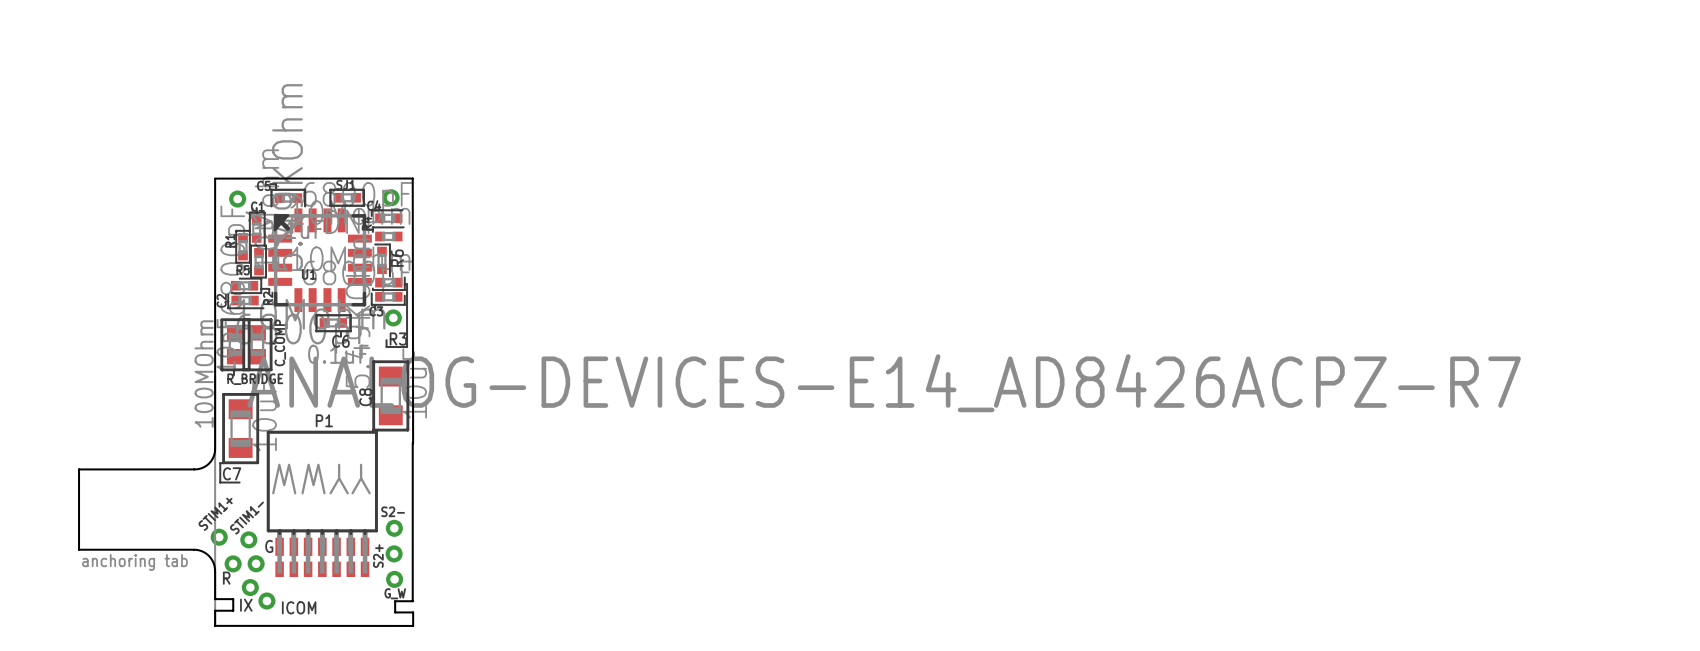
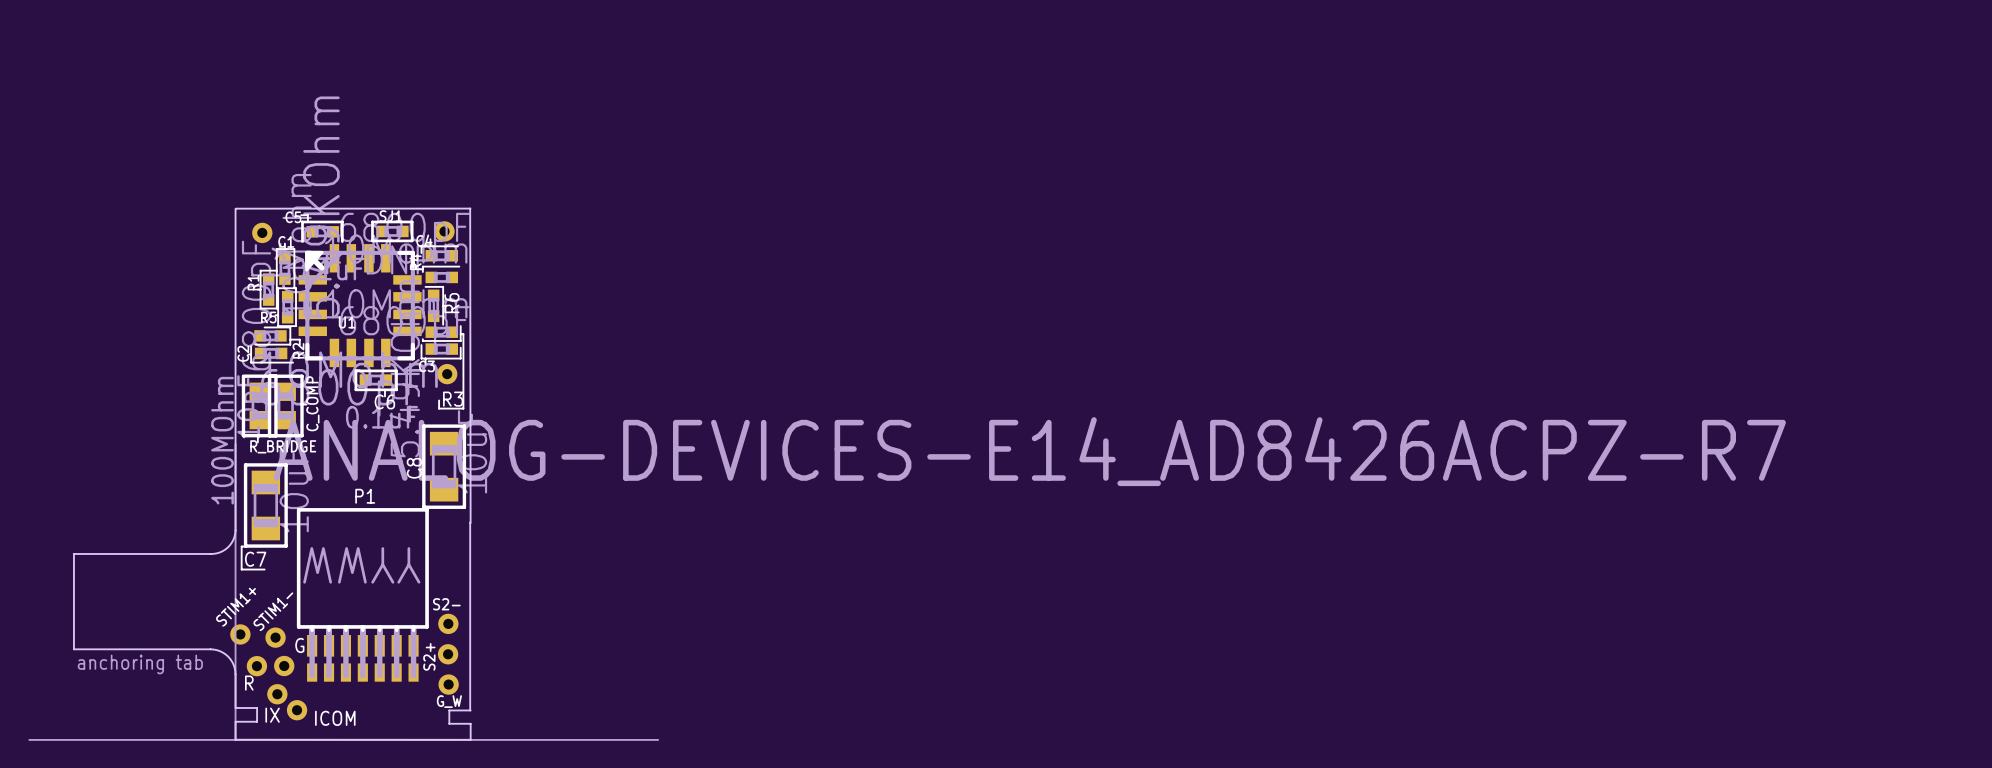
line: none -> (29, 739) (658, 739)

